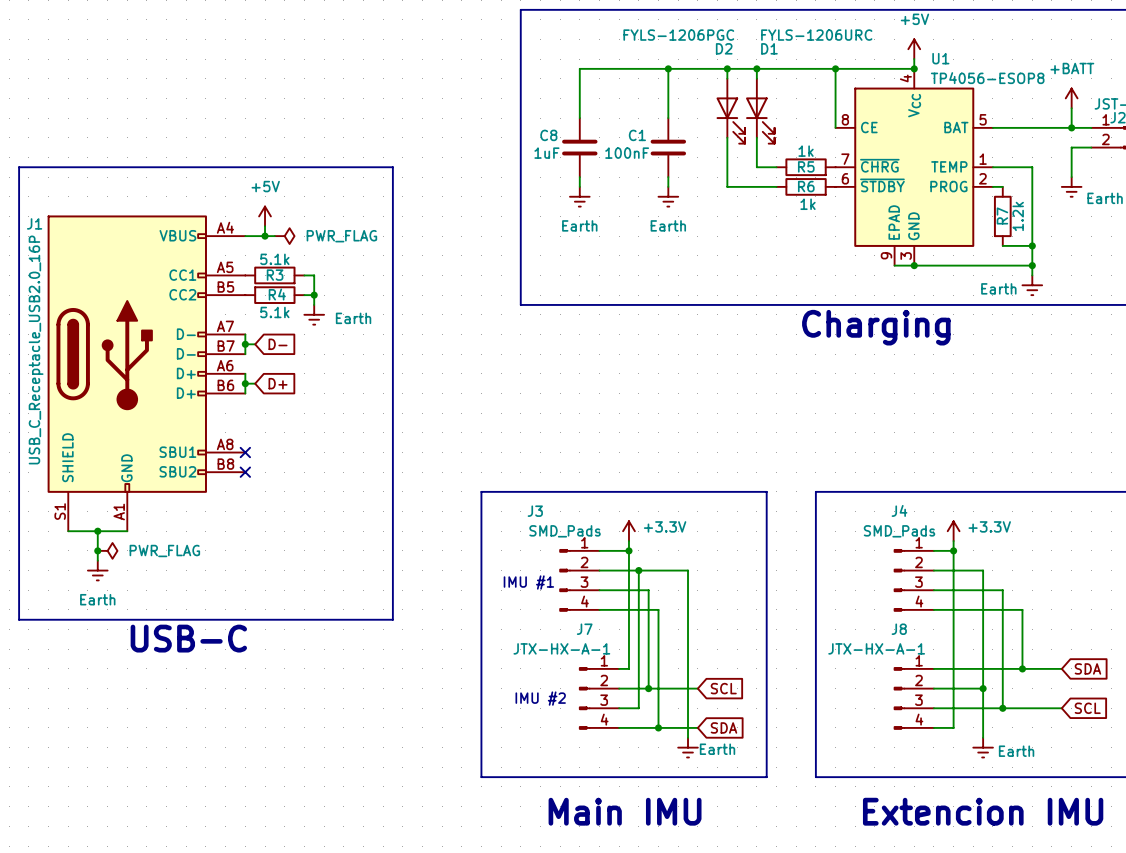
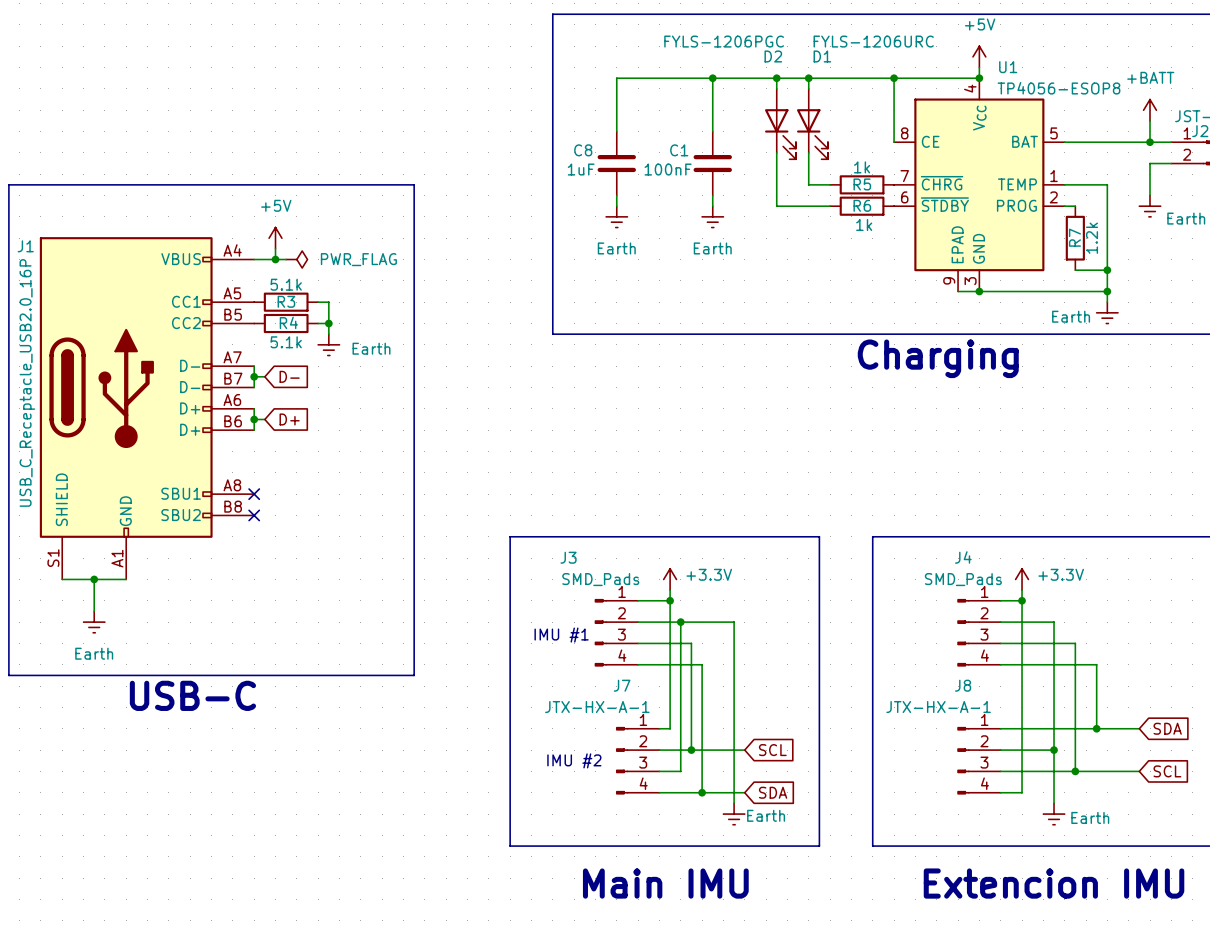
junction: (97, 550) -> none
power symbol: PWR_FLAG (107, 550) -> none

